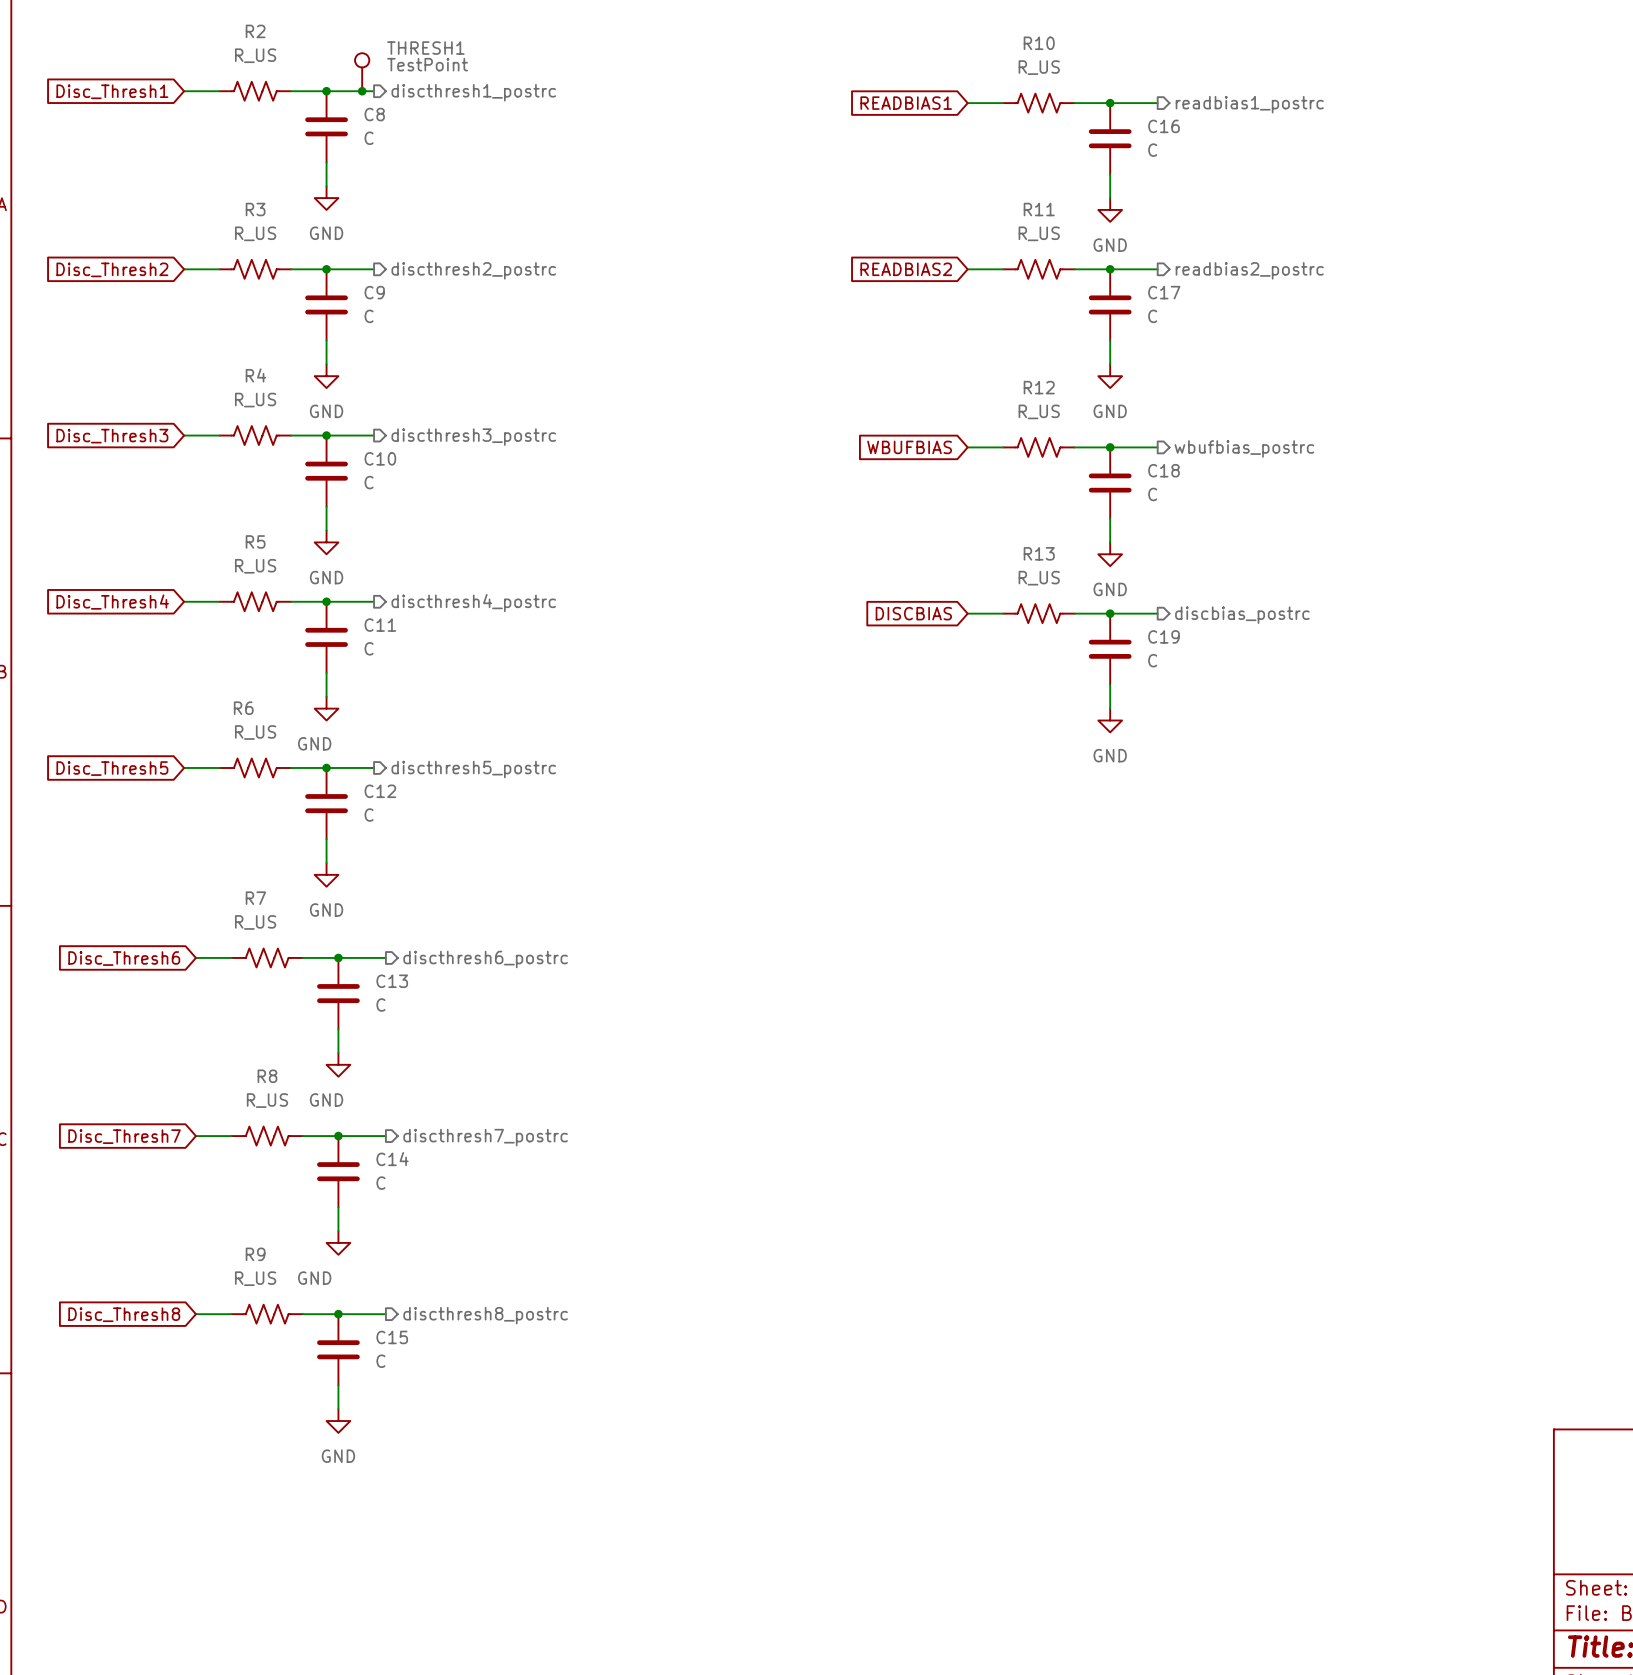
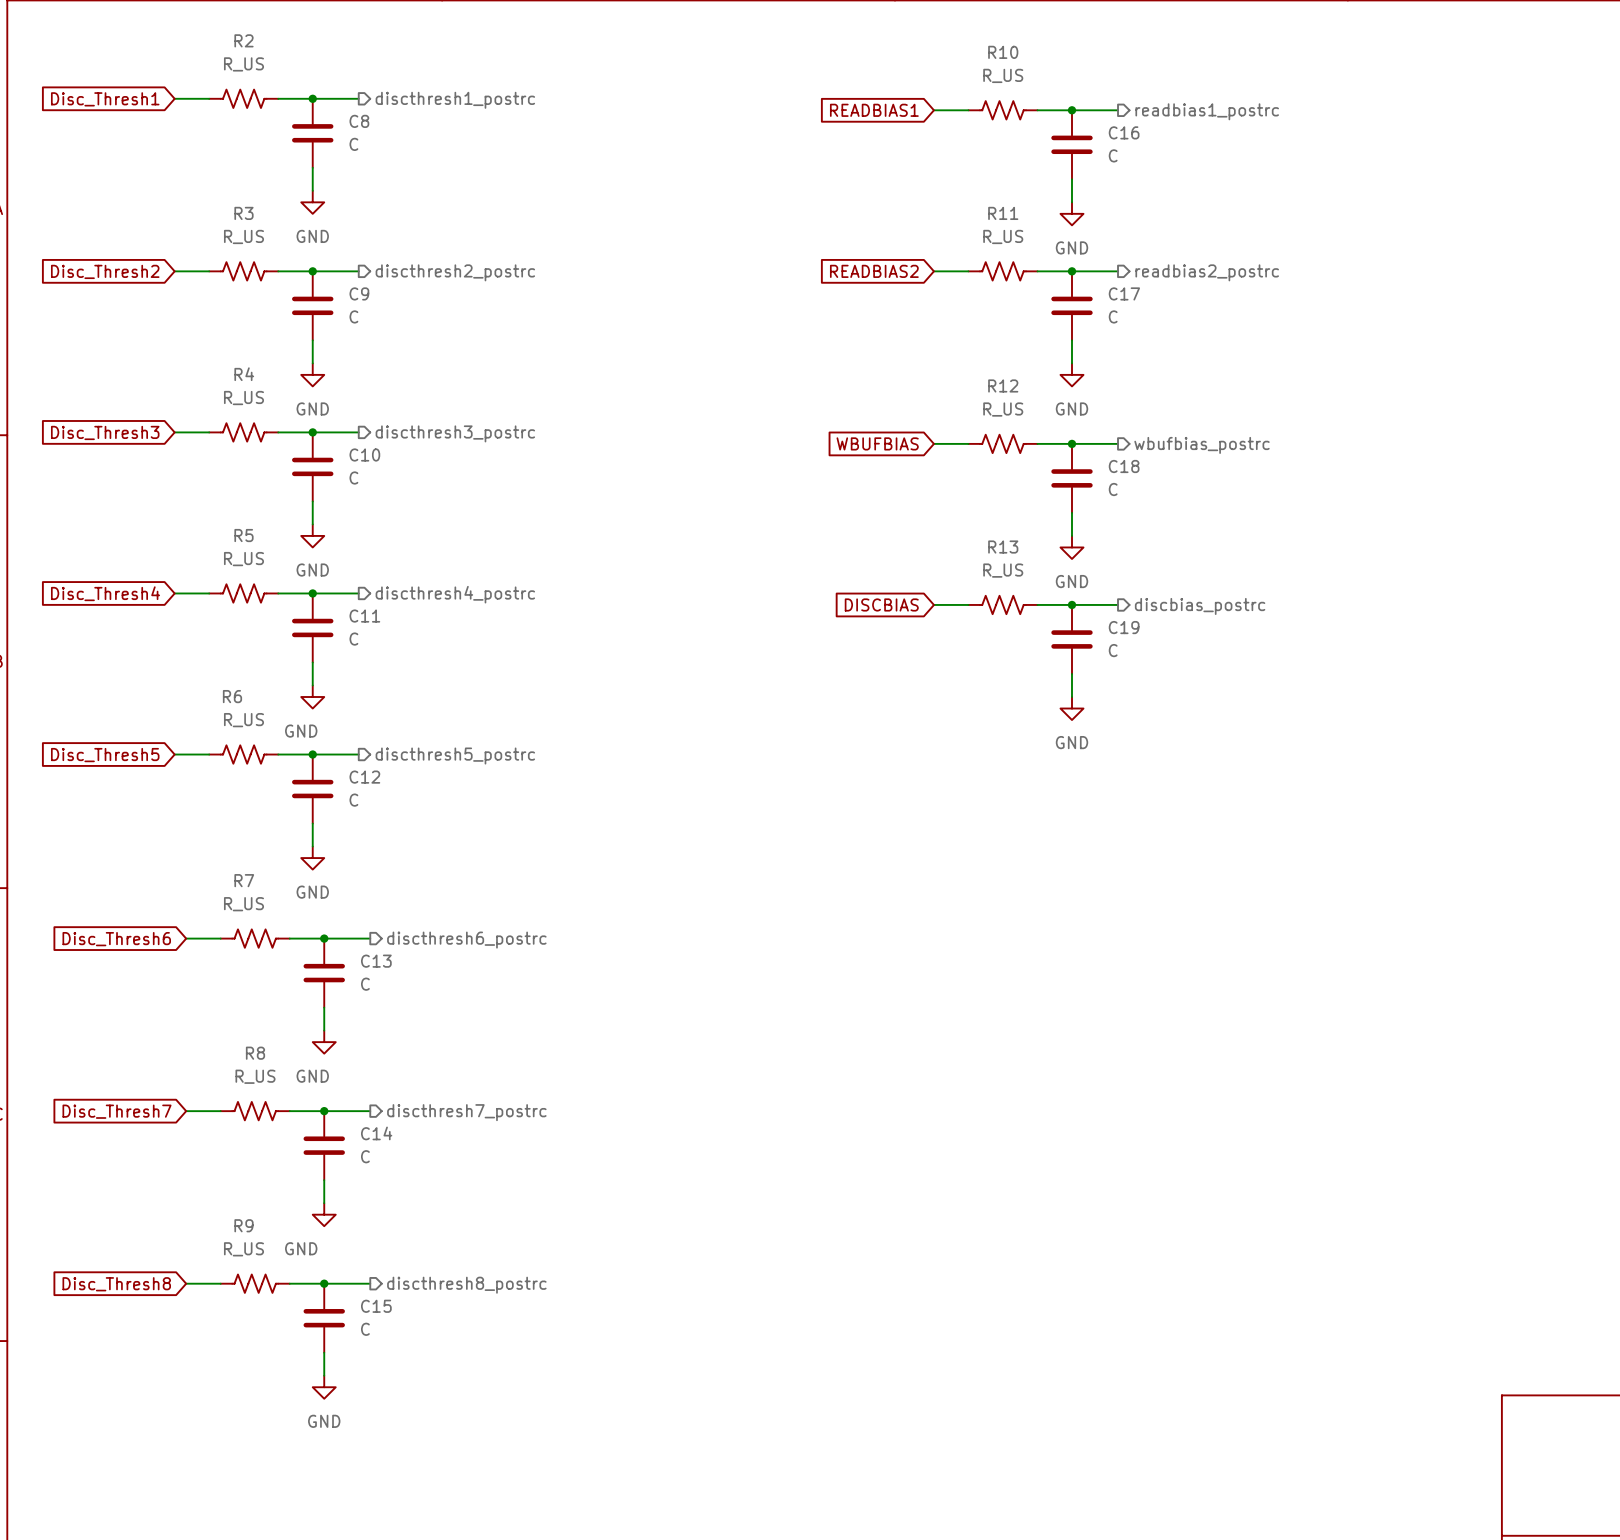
THRESH1: TestPoint (362, 72) -> none
junction: (362, 91) -> none

